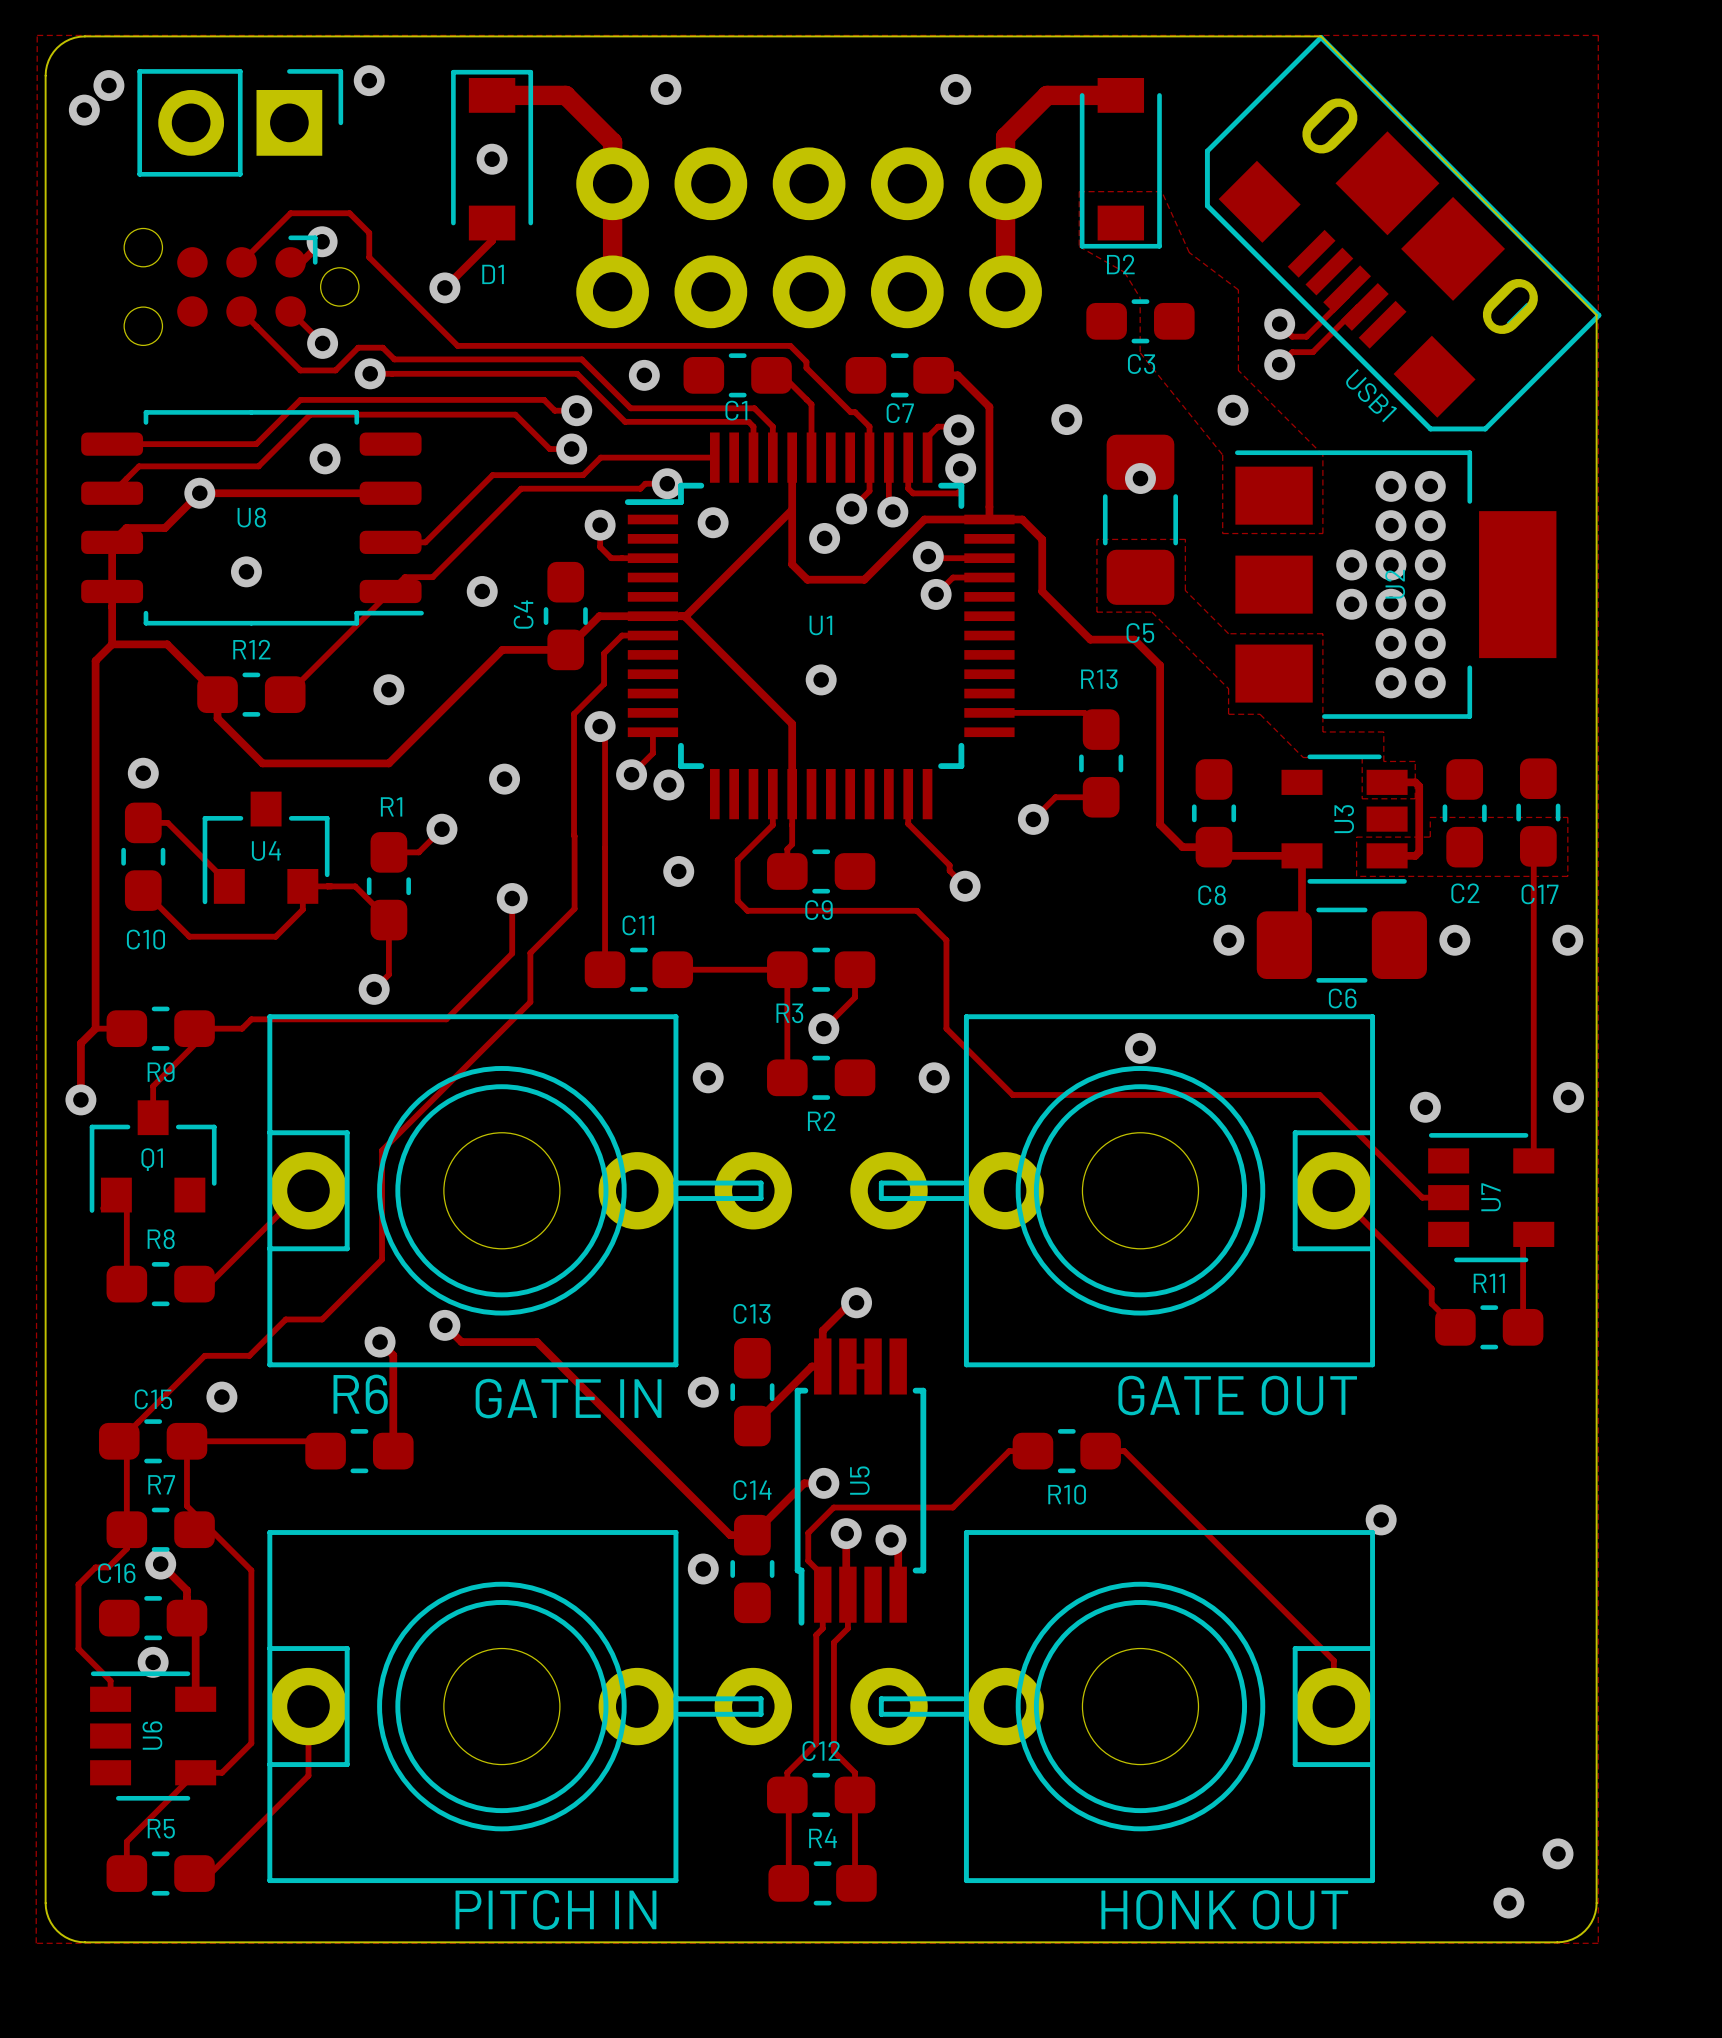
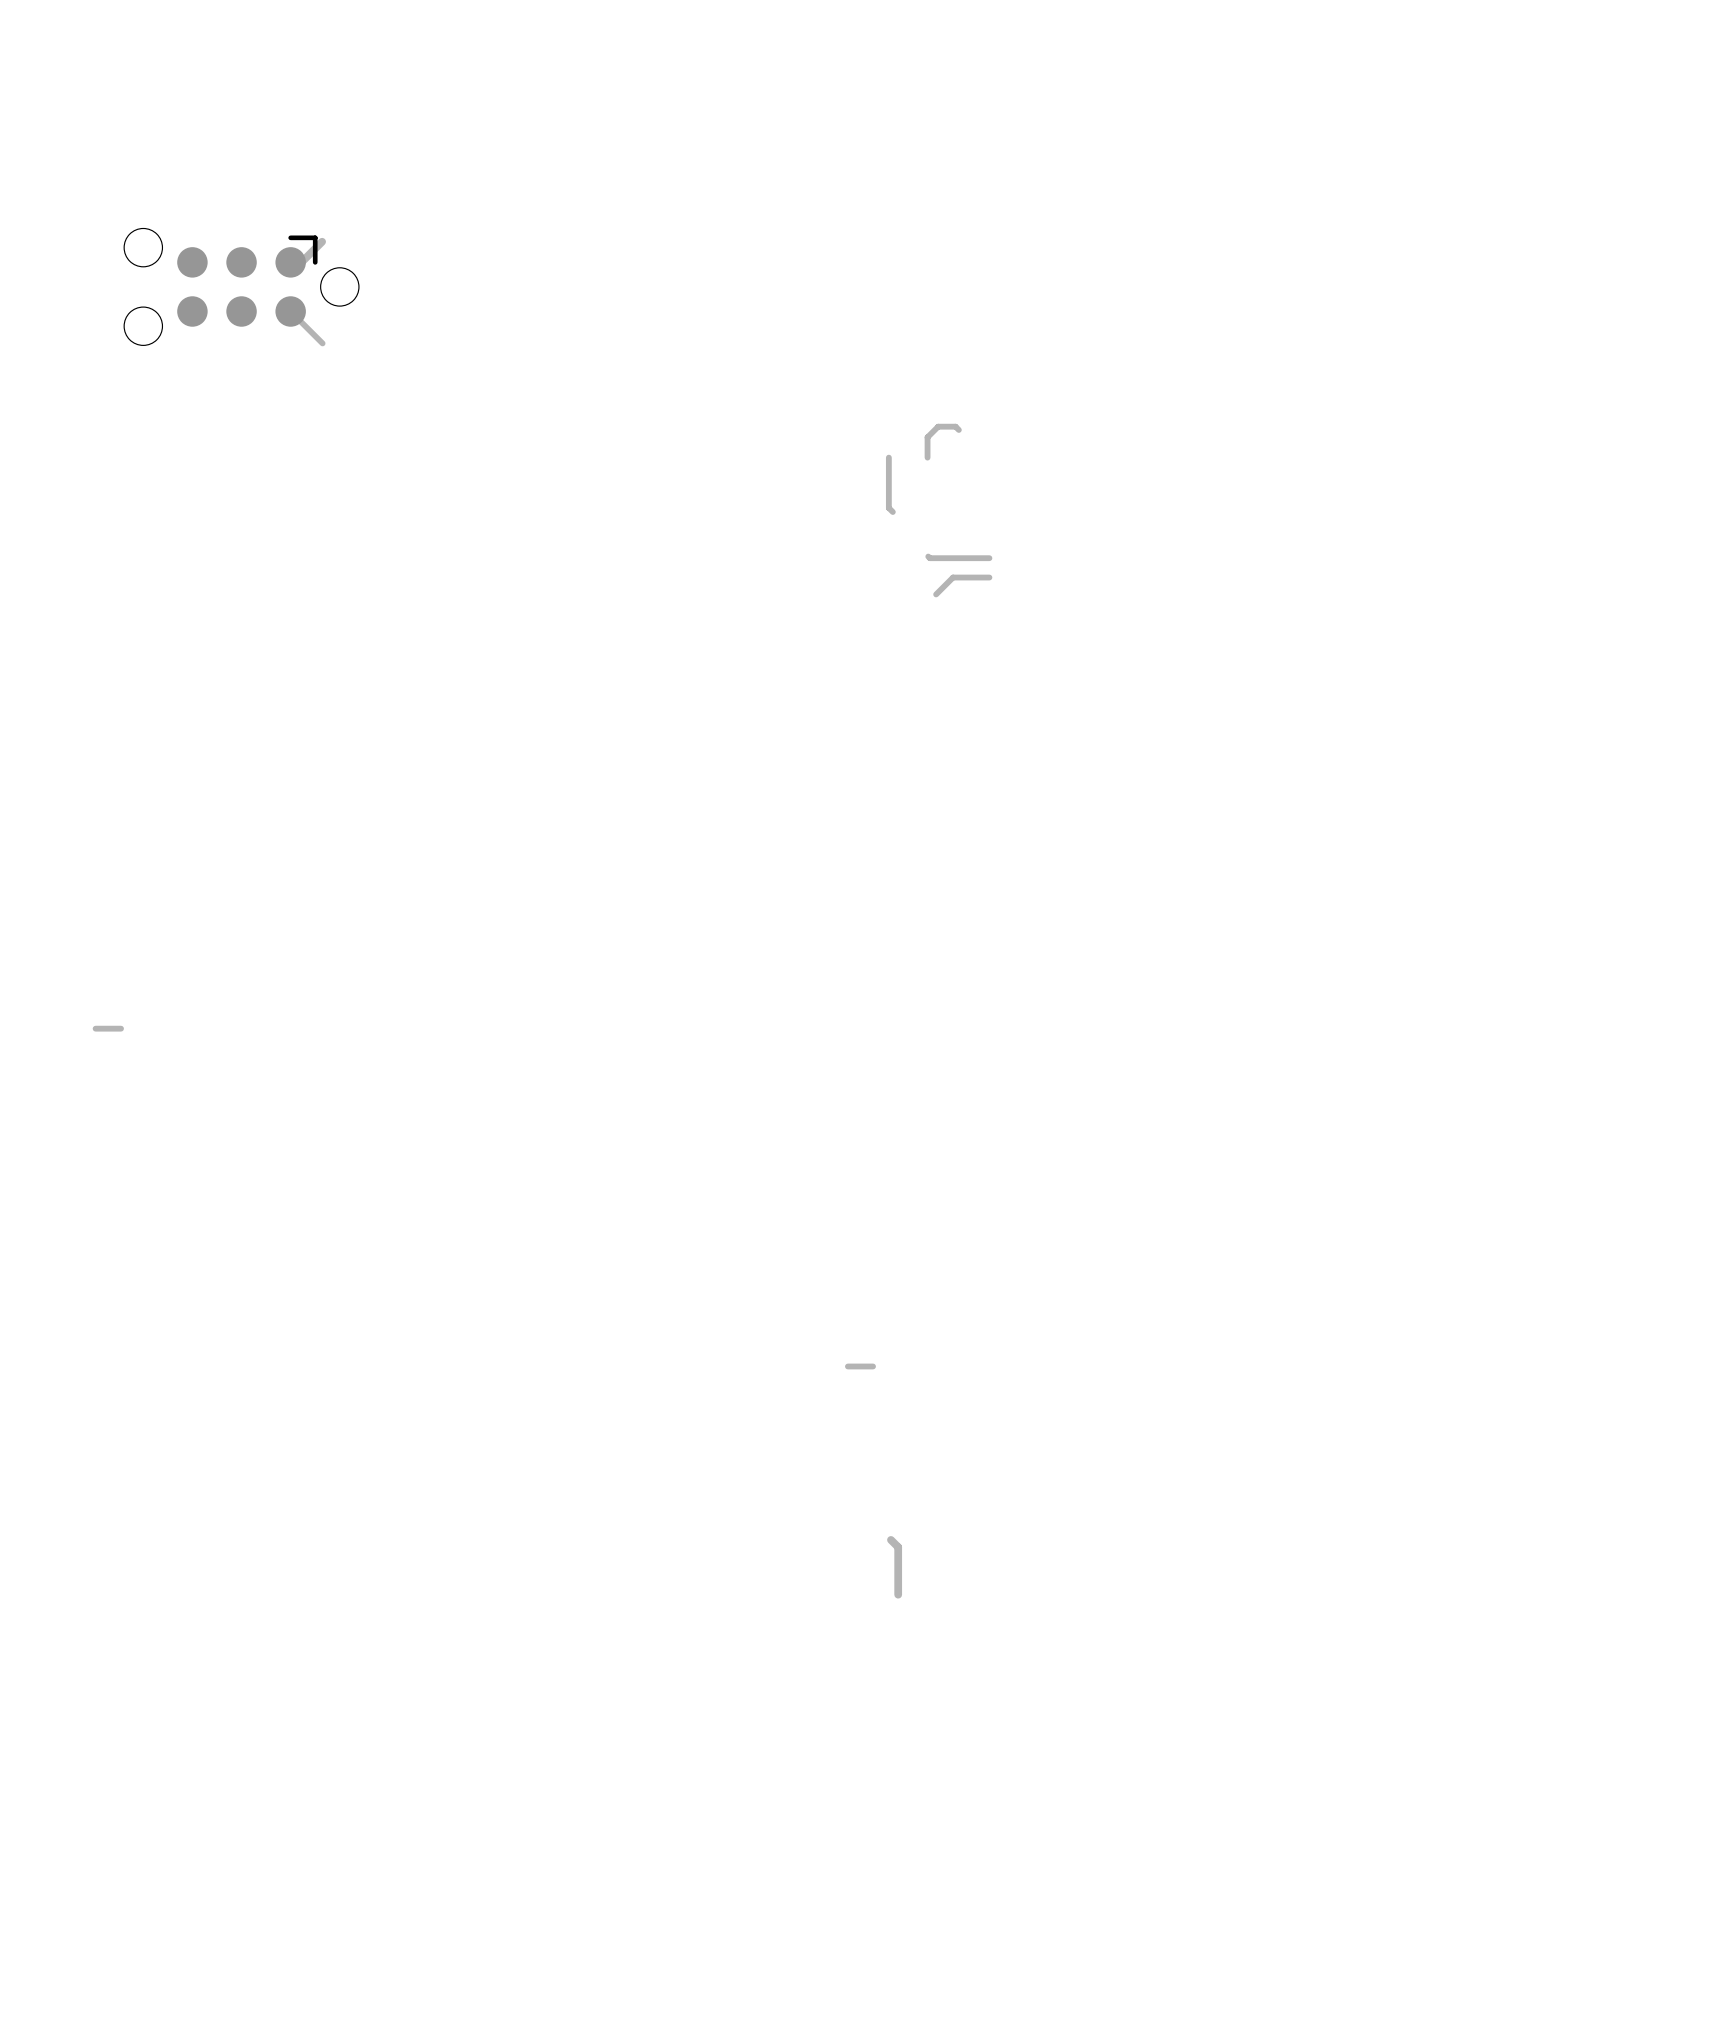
zone outline: (37, 35) (1598, 35) (1598, 1943) (36, 1943) (37, 35) -> none
board edge: (84, 36) (1320, 36) (1596, 314) (1596, 1903) (1591, 1922) (1581, 1934) (1567, 1940) (1557, 1942) (84, 1942) (69, 1939) (53, 1926) (48, 1918) (45, 1903) (45, 75) (48, 60) (57, 47) (69, 39) (84, 36) -> none
via: (369, 80) -> none
via: (108, 85) -> none
via: (665, 89) -> none
via: (955, 89) -> none
track: (492, 95) (565, 95) (612, 142) (612, 291) -> none
track: (1120, 95) (1047, 95) (1005, 136) (1005, 291) -> none
via: (84, 110) -> none
part: (240, 122) -> none
D1: (492, 155) -> none
via: (492, 159) -> none
D2: (1120, 163) -> none
zone outline: (1079, 191) (1161, 191) (1189, 252) (1238, 289) (1238, 370) (1322, 454) (1322, 533) (1222, 533) (1222, 454) (1140, 352) (1140, 297) (1124, 272) (1079, 246) (1079, 191) -> none
track: (492, 223) (492, 240) (444, 287) -> none
USB1: (1403, 233) -> none
part: (809, 237) -> none
via: (322, 241) -> none
track: (241, 262) (290, 213) (349, 213) (369, 232) (369, 257) (457, 345) (790, 345) (806, 361) (806, 367) (850, 412) (855, 412) (869, 426) (869, 491) (851, 508) -> none
via: (444, 287) -> none
track: (1347, 289) (1347, 296) (1306, 336) (1292, 336) (1279, 324) -> none
track: (1364, 306) (1358, 306) (1312, 352) (1292, 352) (1279, 364) -> none
track: (241, 311) (300, 370) (335, 370) (358, 347) (382, 347) (394, 359) (581, 359) (630, 408) (754, 408) (772, 426) (772, 457) -> none
C3: (1140, 321) -> none
via: (1279, 324) -> none
via: (322, 343) -> none
via: (1279, 364) -> none
track: (370, 373) (577, 373) (625, 421) (748, 421) (753, 426) (753, 457) -> none
via: (370, 373) -> none
via: (644, 375) -> none
C1: (737, 375) -> none
C7: (899, 375) -> none
track: (933, 375) (957, 375) (989, 406) (989, 519) -> none
track: (787, 380) (811, 404) (811, 457) -> none
track: (576, 410) (554, 410) (544, 399) (300, 399) (256, 444) (112, 444) -> none
via: (576, 410) -> none
via: (1233, 410) -> none
via: (1066, 419) -> none
via: (958, 429) -> none
track: (571, 449) (549, 449) (515, 414) (310, 414) (258, 466) (139, 466) (112, 493) -> none
via: (571, 449) -> none
track: (714, 457) (600, 457) (583, 475) (492, 475) (425, 542) (390, 542) -> none
track: (792, 457) (792, 564) (807, 579) (864, 579) (924, 519) (1022, 519) (1042, 539) (1042, 591) (1090, 639) (1134, 639) (1160, 665) (1160, 824) (1182, 847) (1214, 847) (1222, 855) (1302, 855) (1302, 927) (1284, 945) -> none
track: (908, 457) (908, 488) (913, 493) (957, 493) (960, 490) (960, 468) -> none
via: (325, 458) -> none
via: (960, 468) -> none
via: (1140, 478) -> none
track: (667, 483) (645, 483) (640, 488) (521, 488) (432, 577) (404, 577) (287, 694) (285, 694) -> none
via: (667, 483) -> none
via: (1390, 486) -> none
via: (1430, 486) -> none
via: (199, 493) -> none
track: (390, 493) (199, 493) (165, 528) (126, 528) (112, 542) (112, 644) -> none
via: (851, 508) -> none
track: (792, 509) (685, 616) (599, 616) (565, 649) (502, 649) (388, 763) (262, 763) (217, 718) (217, 694) (167, 644) (112, 644) -> none
via: (892, 512) -> none
U8: (252, 517) -> none
C5: (1140, 519) -> none
via: (713, 522) -> none
track: (600, 525) (600, 547) (611, 558) (652, 558) -> none
via: (600, 525) -> none
via: (1390, 525) -> none
via: (1430, 525) -> none
via: (824, 538) -> none
zone outline: (1096, 539) (1185, 539) (1185, 590) (1228, 633) (1322, 633) (1322, 731) (1383, 731) (1383, 761) (1415, 761) (1415, 798) (1362, 798) (1362, 757) (1303, 757) (1260, 714) (1228, 714) (1228, 688) (1151, 612) (1096, 612) (1096, 539) -> none
via: (928, 556) -> none
via: (1351, 564) -> none
via: (1390, 564) -> none
via: (1430, 564) -> none
via: (246, 571) -> none
U2: (1395, 584) -> none
via: (482, 591) -> none
via: (936, 594) -> none
via: (1351, 604) -> none
via: (1390, 604) -> none
via: (1430, 604) -> none
C4: (565, 616) -> none
track: (684, 616) (792, 723) (792, 844) (787, 849) (787, 871) -> none
U1: (819, 625) -> none
track: (652, 635) (621, 635) (604, 653) (604, 684) (574, 714) (574, 908) (530, 953) (530, 1002) (382, 1150) (382, 1259) (322, 1319) (285, 1319) (249, 1355) (204, 1355) (119, 1441) (126, 1448) (126, 1548) (108, 1567) (95, 1567) (78, 1584) (78, 1648) (110, 1680) (110, 1699) -> none
via: (1390, 643) -> none
via: (1430, 643) -> none
track: (112, 644) (95, 660) (95, 1028) (80, 1043) (80, 1099) -> none
via: (821, 679) -> none
via: (1390, 682) -> none
via: (1430, 682) -> none
via: (388, 689) -> none
R12: (251, 694) -> none
track: (989, 712) (1084, 712) (1101, 729) -> none
track: (600, 726) (605, 731) (605, 969) -> none
via: (600, 726) -> none
track: (652, 732) (652, 753) (631, 774) -> none
R13: (1101, 763) -> none
via: (143, 773) -> none
via: (631, 774) -> none
via: (504, 779) -> none
track: (1387, 782) (1415, 782) (1419, 786) (1419, 851) (1415, 855) (1387, 855) -> none
via: (668, 784) -> none
track: (772, 794) (772, 825) (737, 860) (737, 900) (747, 910) (916, 910) (946, 940) (946, 1028) (1012, 1094) (1319, 1094) (1422, 1197) (1448, 1197) -> none
track: (908, 794) (908, 823) (949, 865) (949, 870) (965, 886) -> none
track: (1101, 797) (1055, 797) (1033, 819) -> none
C17: (1538, 812) -> none
C8: (1214, 813) -> none
C2: (1464, 813) -> none
zone outline: (1430, 817) (1430, 837) (1356, 837) (1356, 876) (1567, 876) (1567, 817) (1430, 817) -> none
via: (1033, 819) -> none
U3: (1344, 819) -> none
track: (143, 822) (167, 822) (229, 886) -> none
track: (441, 828) (418, 852) (388, 852) -> none
via: (441, 829) -> none
track: (1538, 846) (1533, 850) (1533, 1160) (1538, 1156) -> none
U4: (266, 847) -> none
C10: (143, 856) -> none
via: (678, 871) -> none
C9: (821, 871) -> none
R1: (388, 886) -> none
via: (965, 886) -> none
track: (143, 890) (189, 936) (275, 936) (302, 909) (302, 886) (355, 886) (388, 920) (388, 974) (374, 989) -> none
track: (512, 898) (512, 953) (446, 1019) (251, 1019) (242, 1028) (210, 1028) (153, 1086) (153, 1117) -> none
via: (512, 898) -> none
via: (1228, 940) -> none
via: (1454, 940) -> none
via: (1567, 940) -> none
C6: (1341, 945) -> none
C11: (638, 969) -> none
track: (672, 969) (787, 969) (787, 1077) -> none
R3: (821, 969) -> none
track: (855, 969) (855, 997) (823, 1028) -> none
via: (374, 989) -> none
R9: (160, 1028) -> none
via: (823, 1028) -> none
via: (1140, 1048) -> none
via: (708, 1077) -> none
R2: (821, 1077) -> none
via: (934, 1077) -> none
via: (1568, 1097) -> none
via: (80, 1099) -> none
via: (1425, 1107) -> none
Q1: (153, 1156) -> none
track: (308, 1190) (302, 1190) (209, 1284) -> none
part: (529, 1190) -> none
part: (1112, 1190) -> none
track: (1333, 1190) (1431, 1288) (1431, 1303) (1455, 1327) -> none
U7: (1491, 1197) -> none
track: (103, 1208) (116, 1195) (126, 1205) (126, 1284) -> none
track: (1533, 1234) (1523, 1245) (1523, 1327) -> none
R8: (160, 1284) -> none
track: (856, 1302) (850, 1302) (822, 1330) (822, 1366) (811, 1366) (752, 1426) -> none
via: (856, 1302) -> none
track: (444, 1325) (461, 1342) (537, 1342) (730, 1535) (752, 1535) (804, 1483) (823, 1483) -> none
via: (444, 1325) -> none
R11: (1489, 1327) -> none
track: (380, 1342) (393, 1355) (393, 1451) -> none
via: (380, 1342) -> none
via: (703, 1392) -> none
C13: (752, 1392) -> none
text: GATE OUT (1237, 1395) -> none
via: (221, 1397) -> none
text: GATE IN (568, 1398) -> none
C15: (153, 1441) -> none
track: (184, 1441) (315, 1441) (325, 1451) -> none
track: (186, 1441) (186, 1506) (251, 1570) (251, 1743) (221, 1772) (195, 1772) (126, 1841) (126, 1873) -> none
R6: (359, 1451) -> none
track: (1032, 1451) (1009, 1451) (952, 1507) (833, 1507) (808, 1532) (808, 1560) (822, 1575) (822, 1628) (816, 1635) (816, 1743) (787, 1772) (788, 1883) -> none
R10: (1066, 1451) -> none
track: (1100, 1451) (1124, 1451) (1333, 1660) (1333, 1706) -> none
U5: (860, 1482) -> none
via: (823, 1483) -> none
via: (1381, 1519) -> none
R7: (160, 1529) -> none
track: (846, 1533) (847, 1628) (833, 1642) (833, 1751) (855, 1772) (856, 1883) -> none
via: (846, 1533) -> none
via: (890, 1539) -> none
track: (160, 1564) (186, 1590) (186, 1618) (195, 1626) (195, 1699) -> none
via: (160, 1564) -> none
via: (703, 1569) -> none
C14: (752, 1569) -> none
C16: (153, 1618) -> none
via: (153, 1662) -> none
track: (308, 1706) (308, 1775) (210, 1873) -> none
part: (529, 1706) -> none
part: (1112, 1706) -> none
U6: (153, 1736) -> none
C12: (821, 1794) -> none
via: (1558, 1853) -> none
R5: (160, 1873) -> none
R4: (822, 1883) -> none
via: (1508, 1903) -> none
text: PITCH IN (555, 1909) -> none
text: HONK OUT (1224, 1909) -> none

